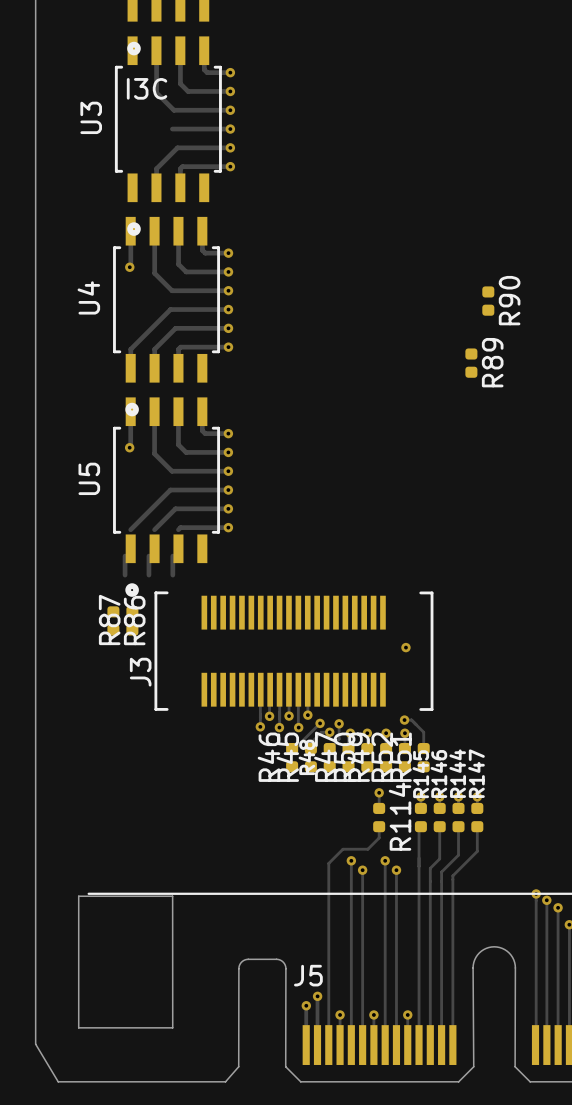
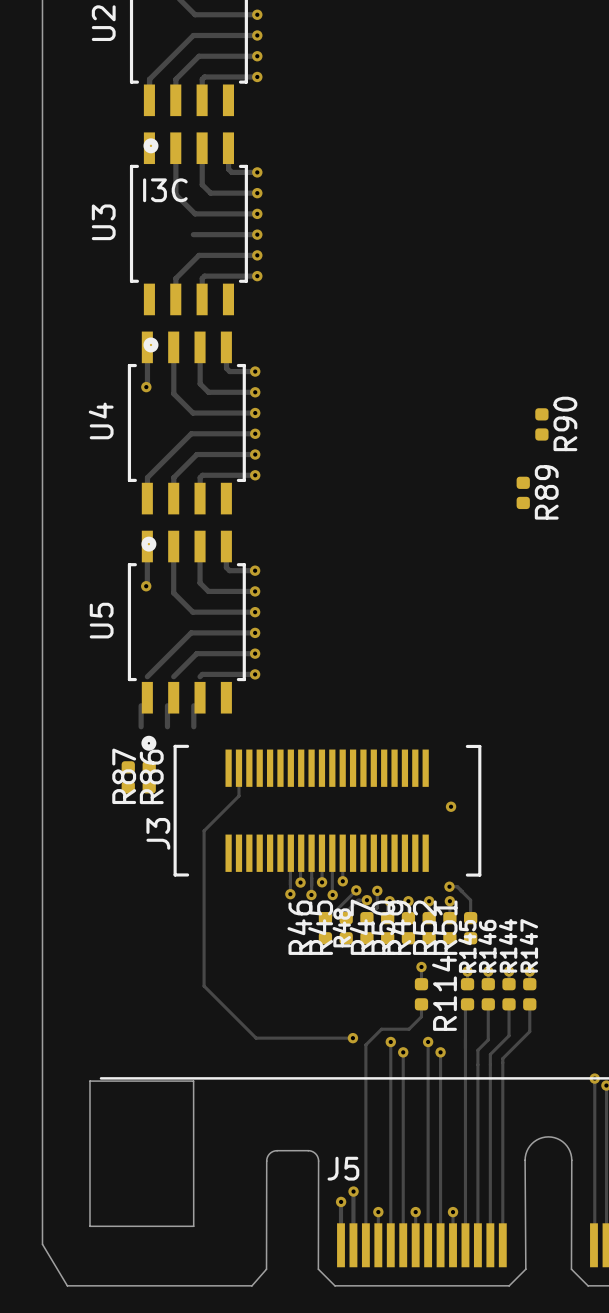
track: none -> (238, 768) (238, 796) (204, 830) (204, 986) (256, 1038) (352, 1038)
via: none -> (352, 1038)

